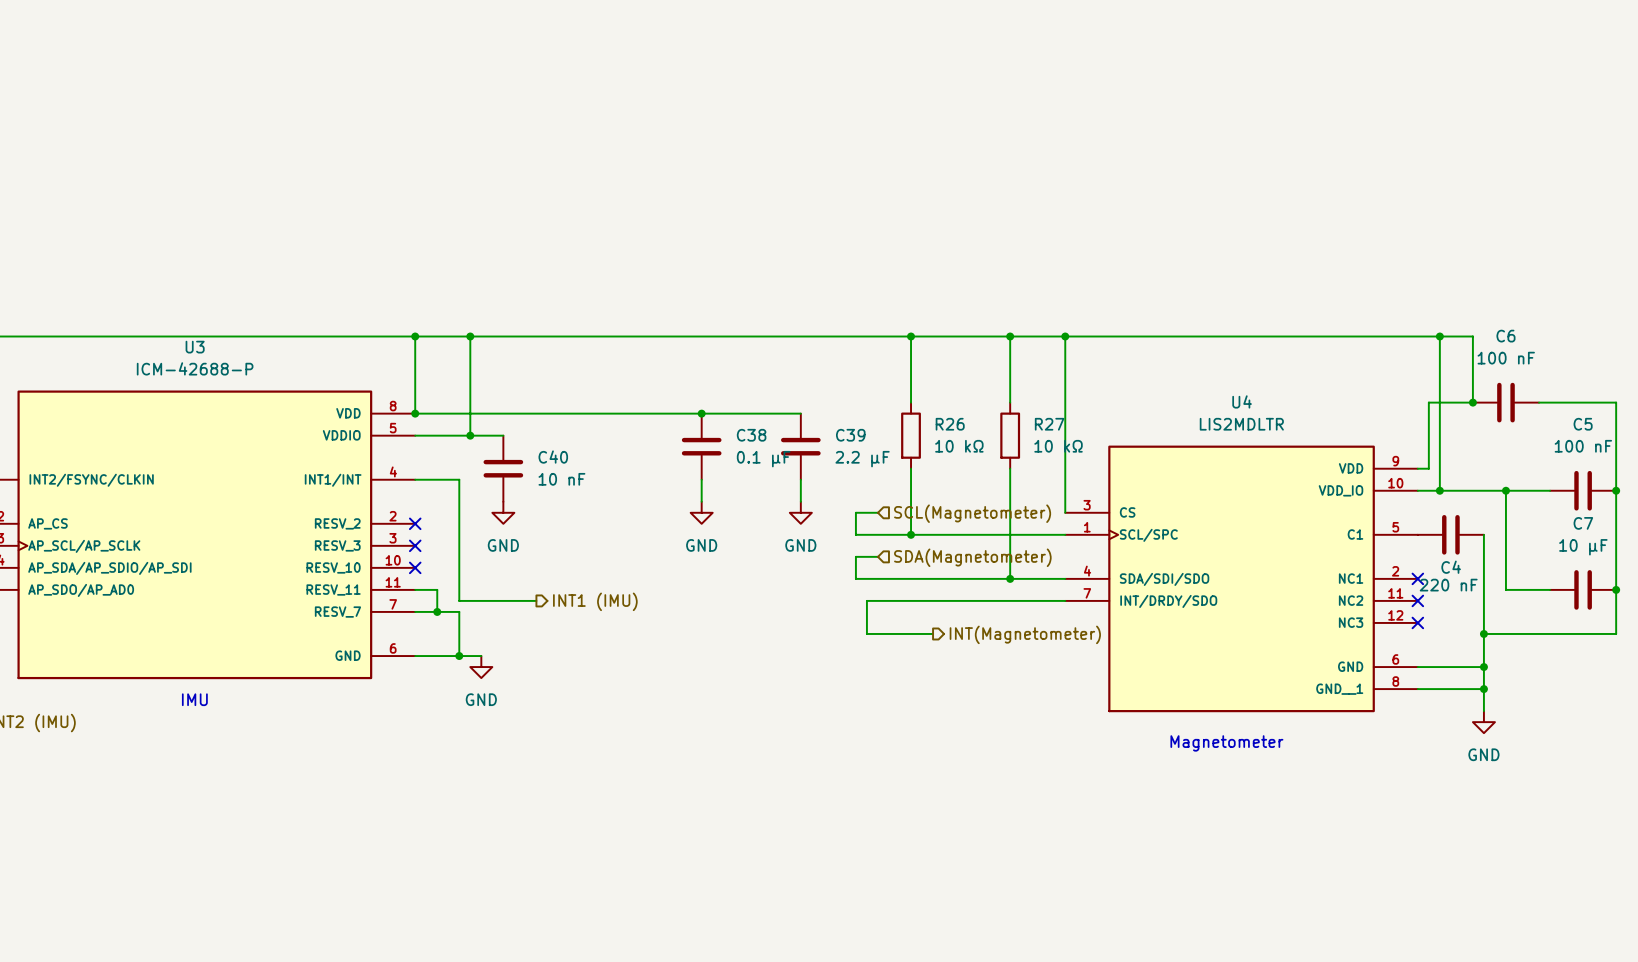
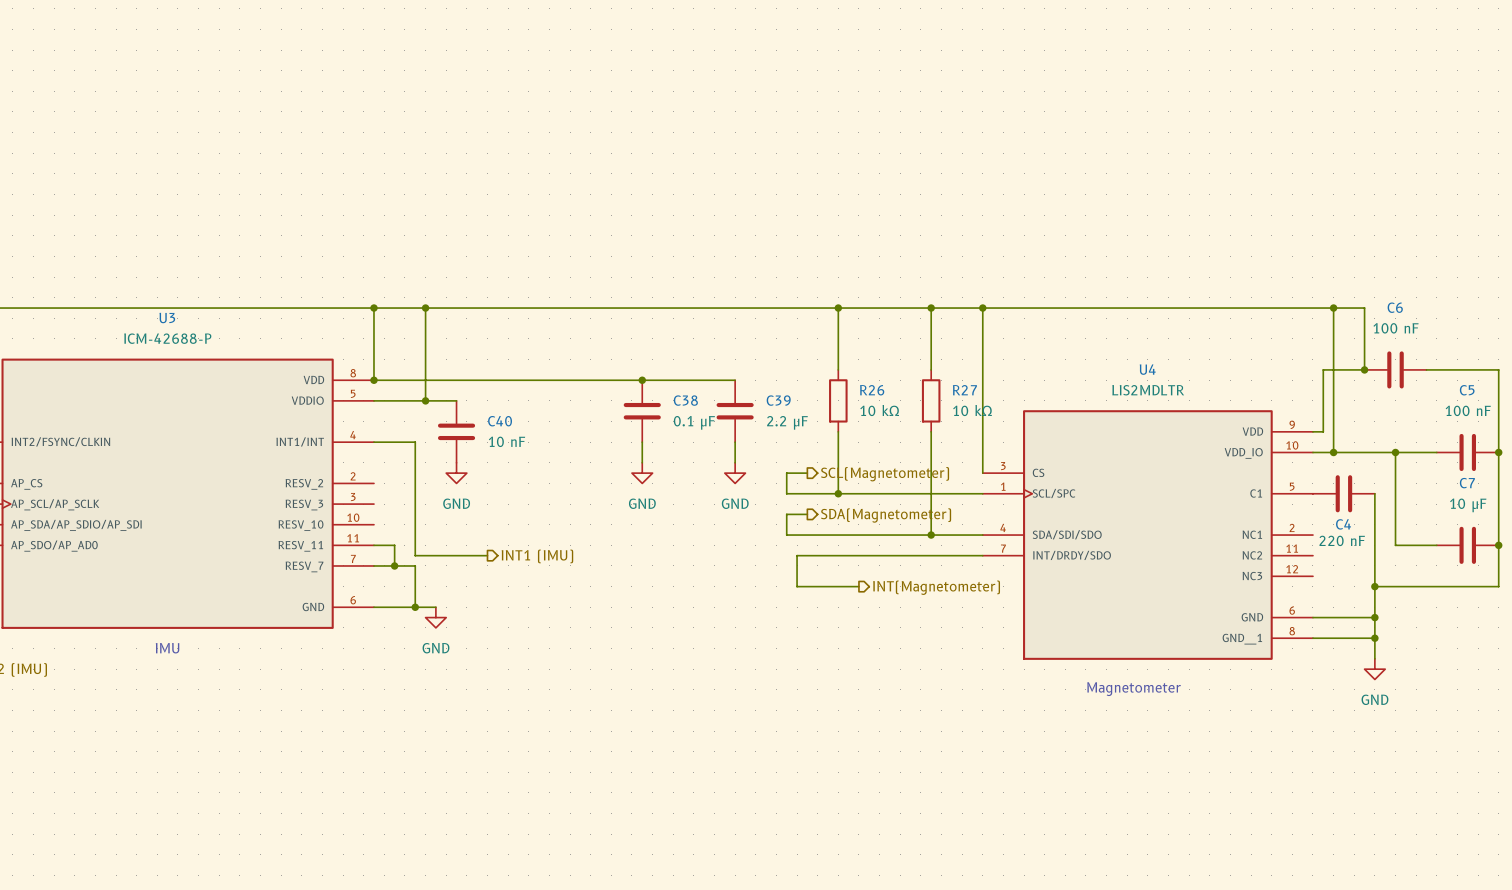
hierarchical label shape: input (972, 513) -> output (885, 474)
no-connect mark: (415, 523) -> none
no-connect mark: (415, 545) -> none
hierarchical label shape: input (972, 557) -> output (886, 515)
no-connect mark: (415, 567) -> none
no-connect mark: (1417, 578) -> none
no-connect mark: (1417, 600) -> none
no-connect mark: (1417, 622) -> none

